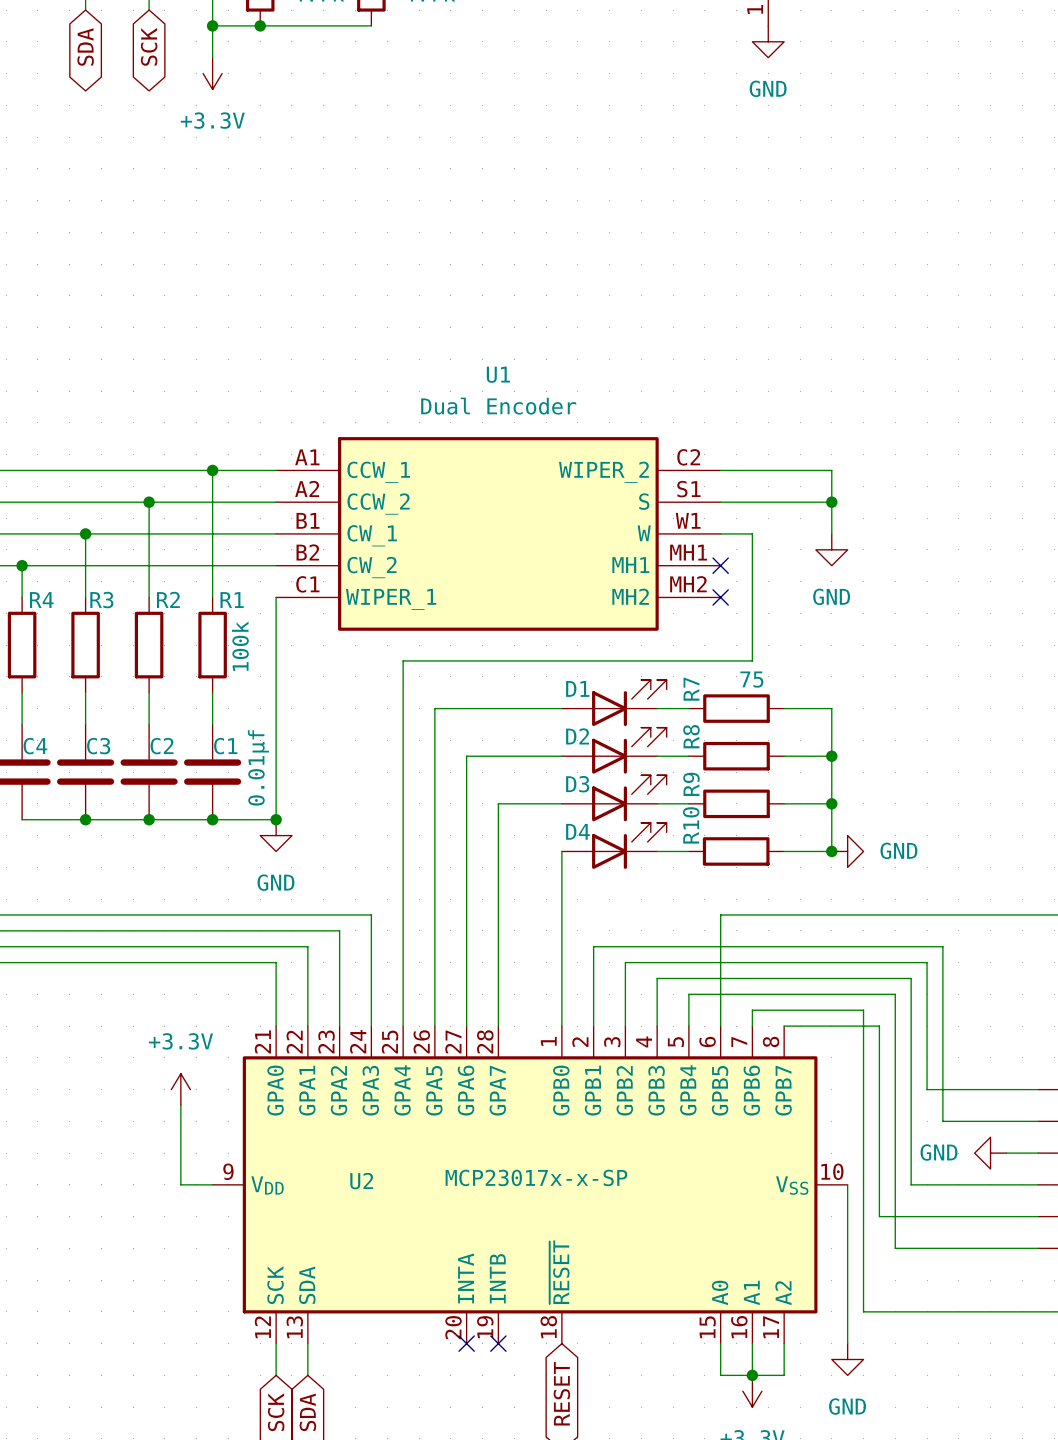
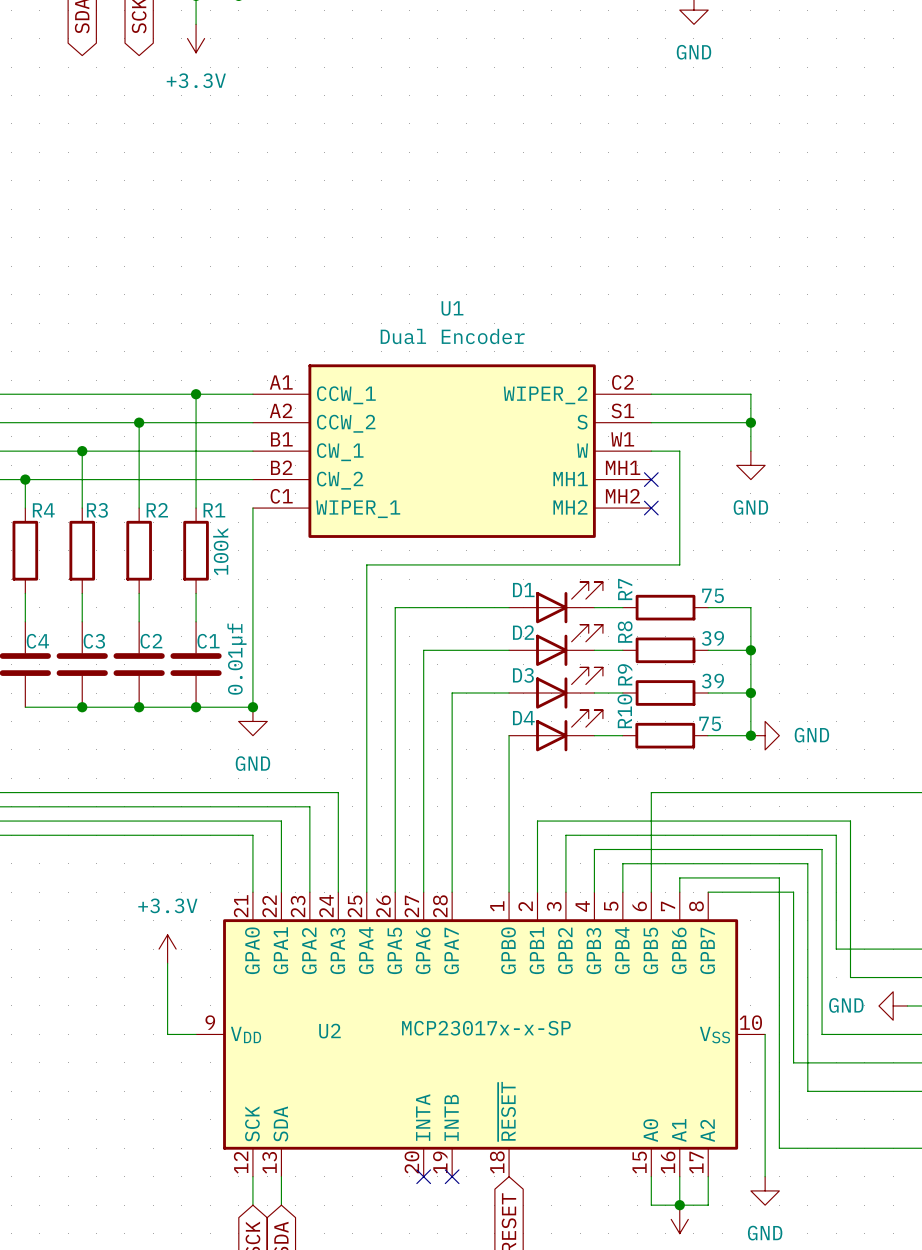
R7 value position: 75 (751, 679) -> 75 (713, 595)
R8 value: none -> 39 (712, 638)
R9 value: none -> 39 (712, 681)
R10 value: none -> 75 (710, 723)

